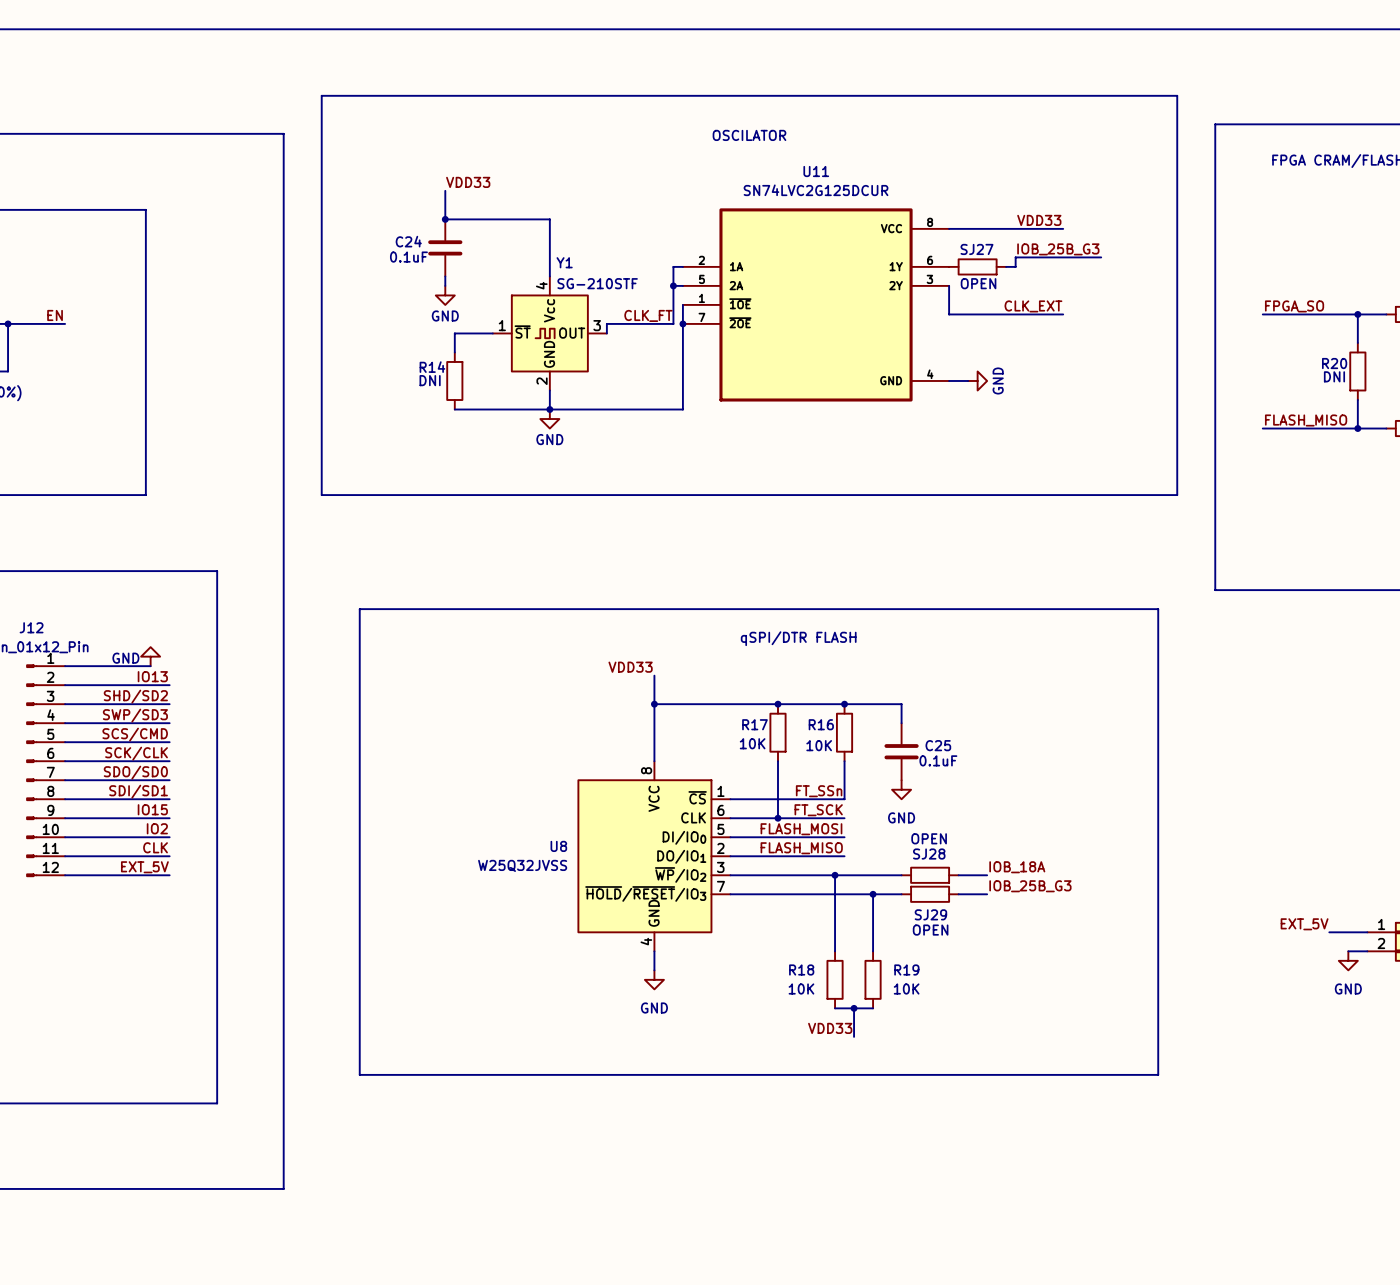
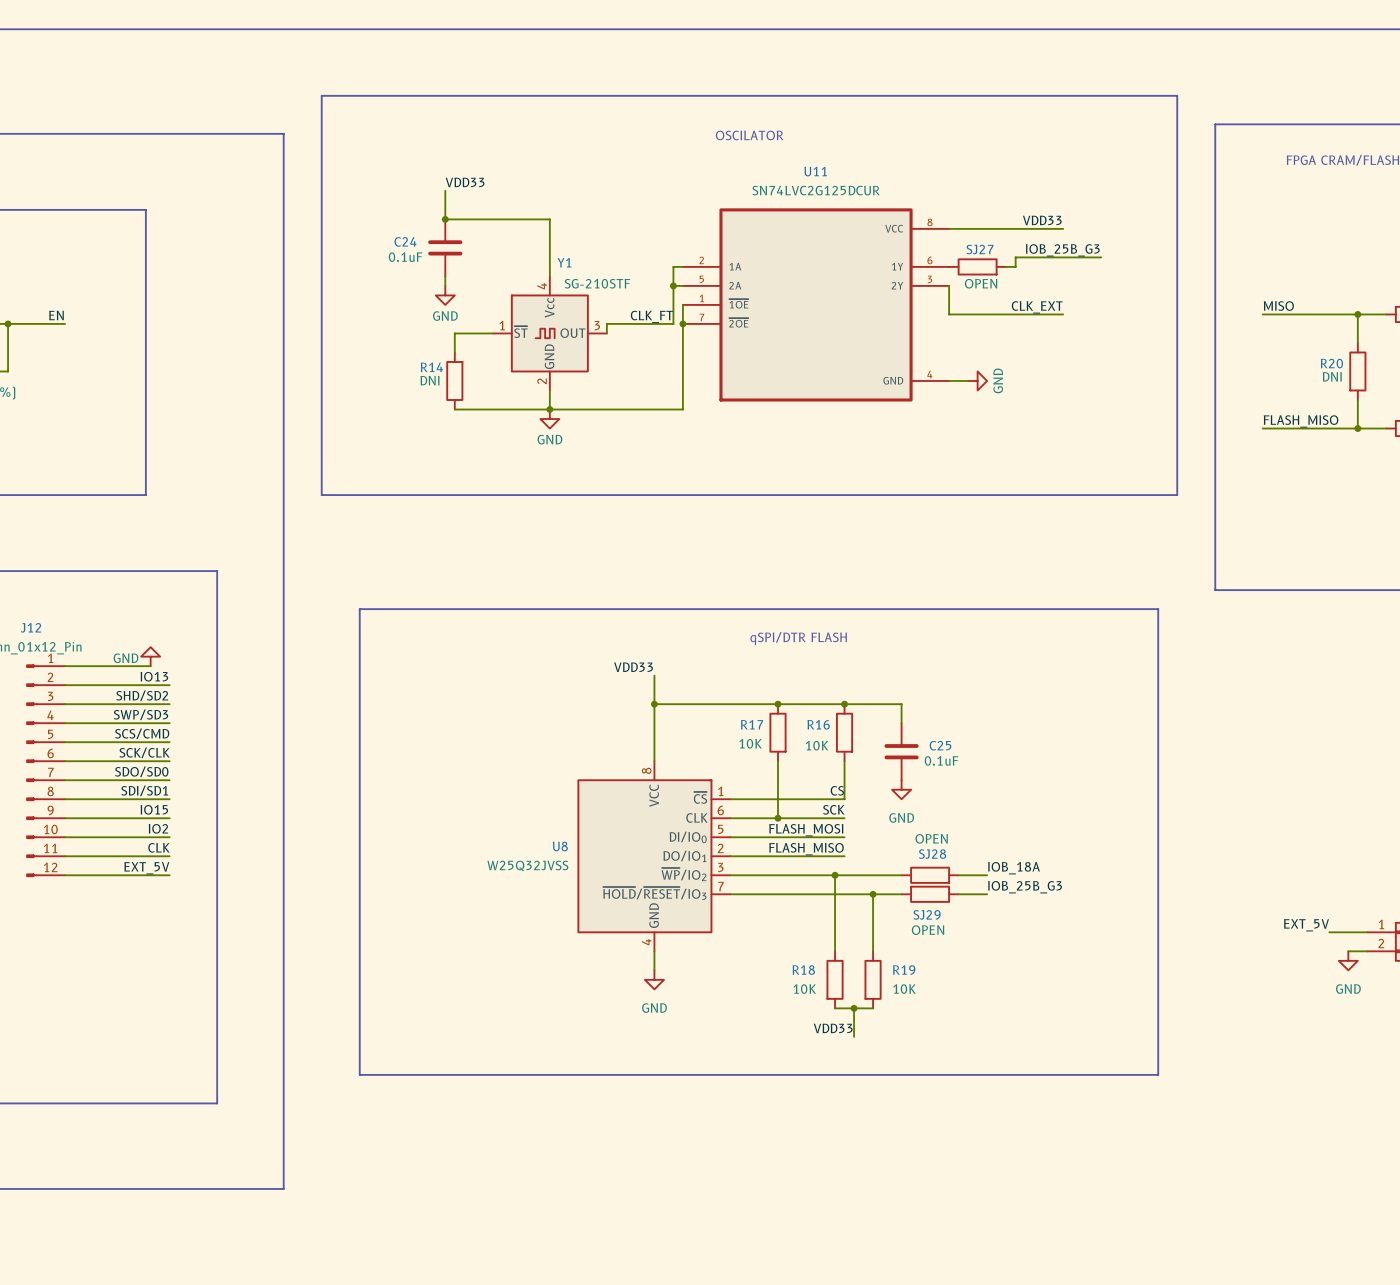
label: FPGA_SO (1294, 306) -> MISO (1278, 306)
label: FT_SSn (819, 791) -> CS (837, 790)
label: FT_SCK (818, 810) -> SCK (833, 809)

